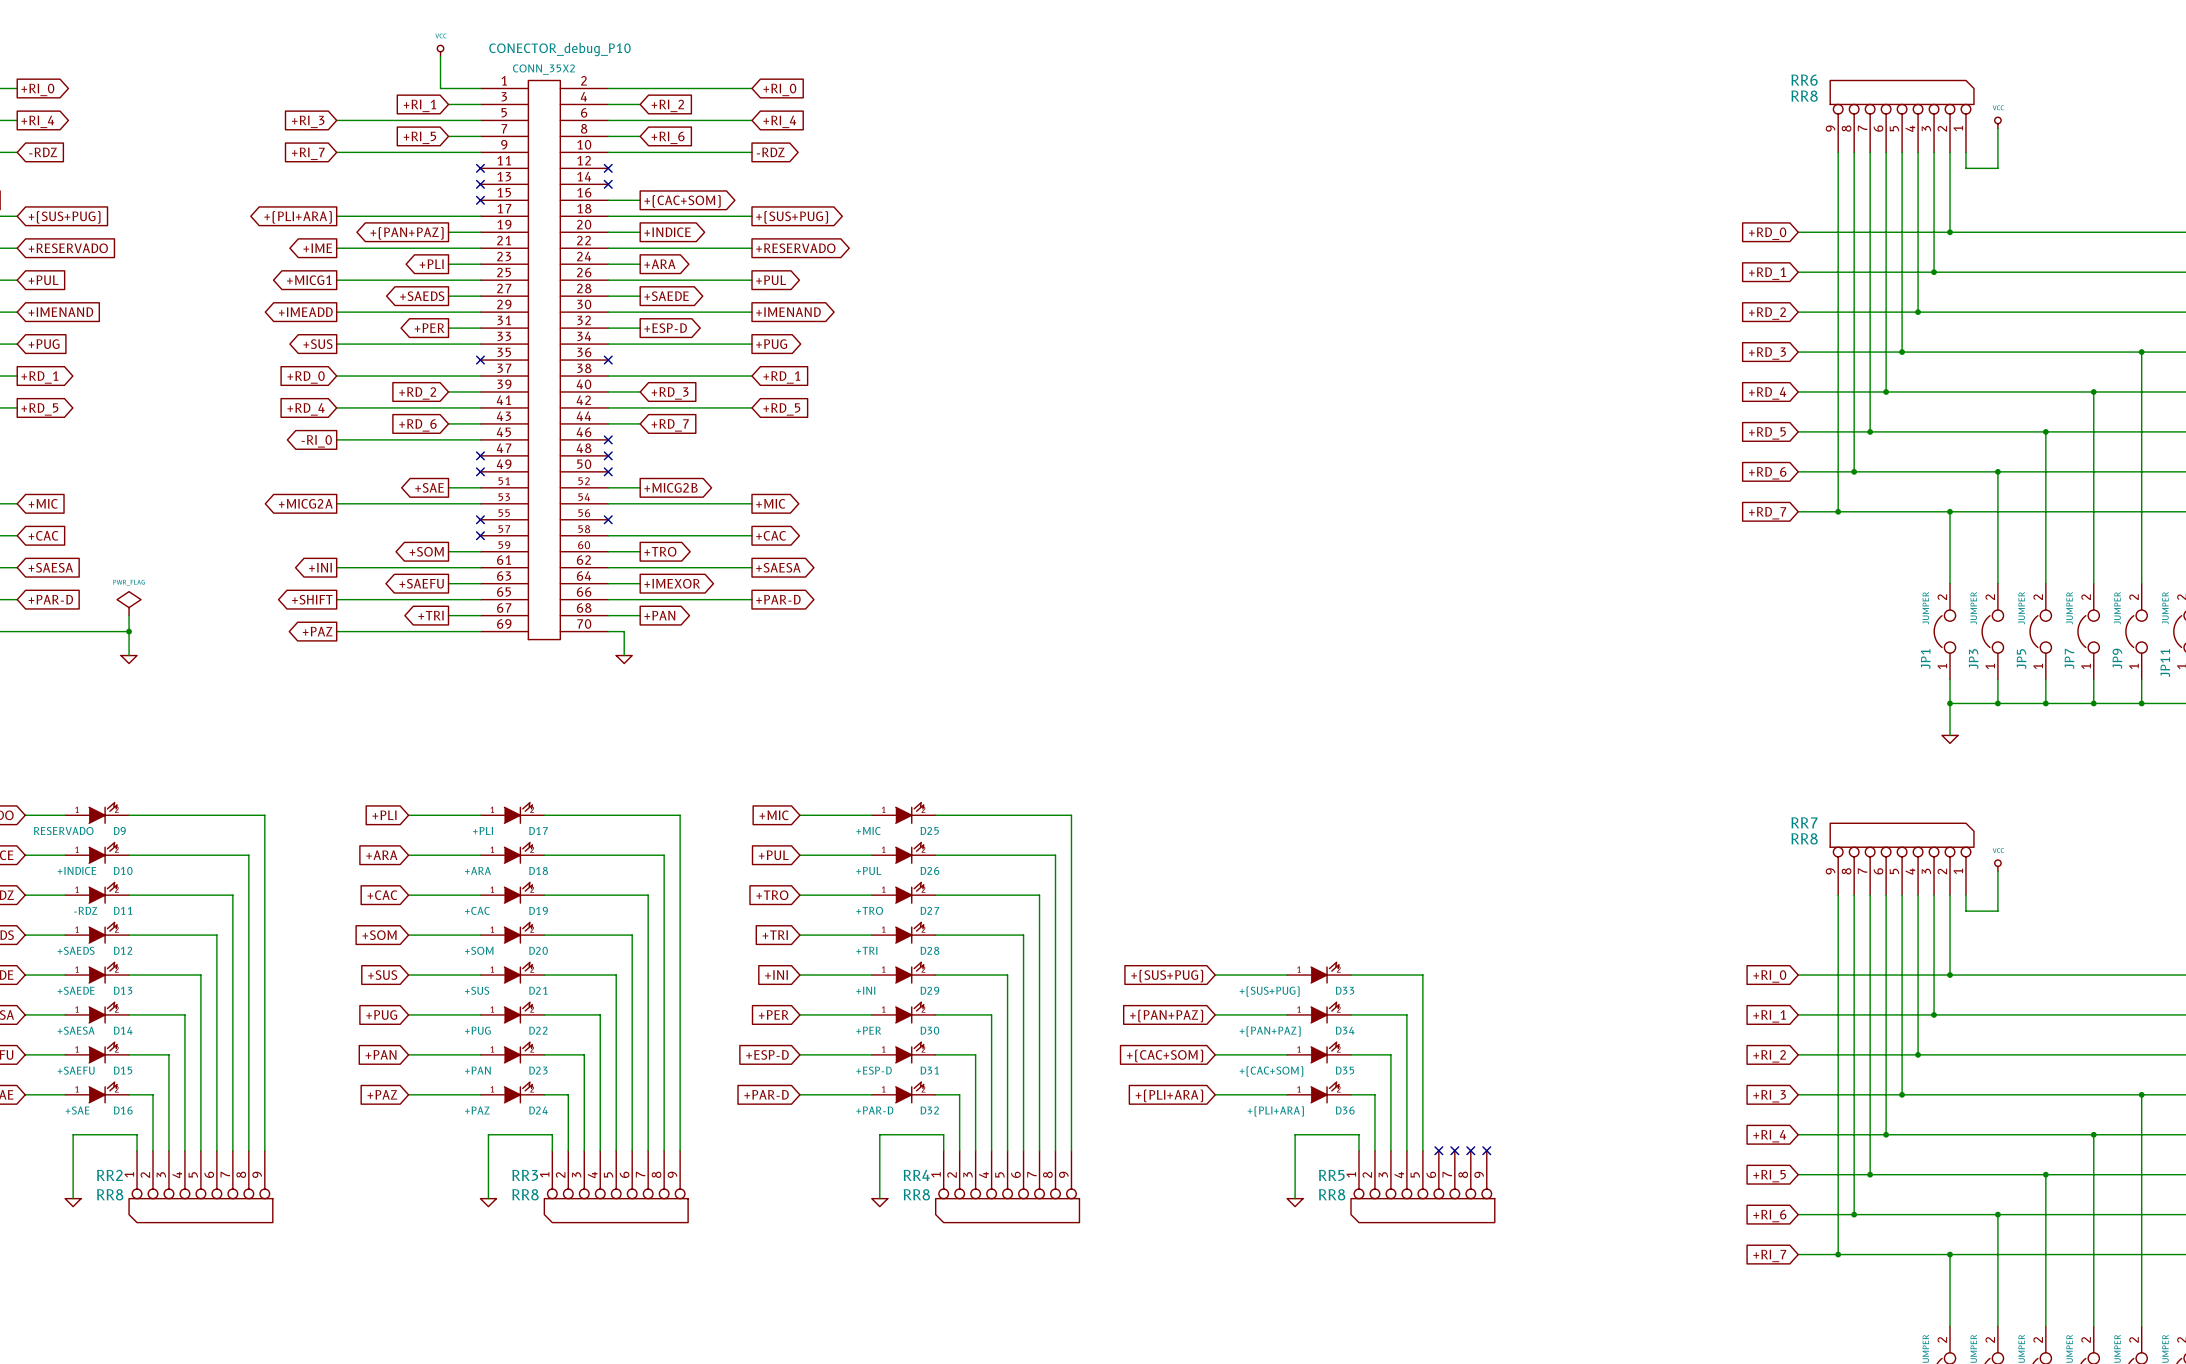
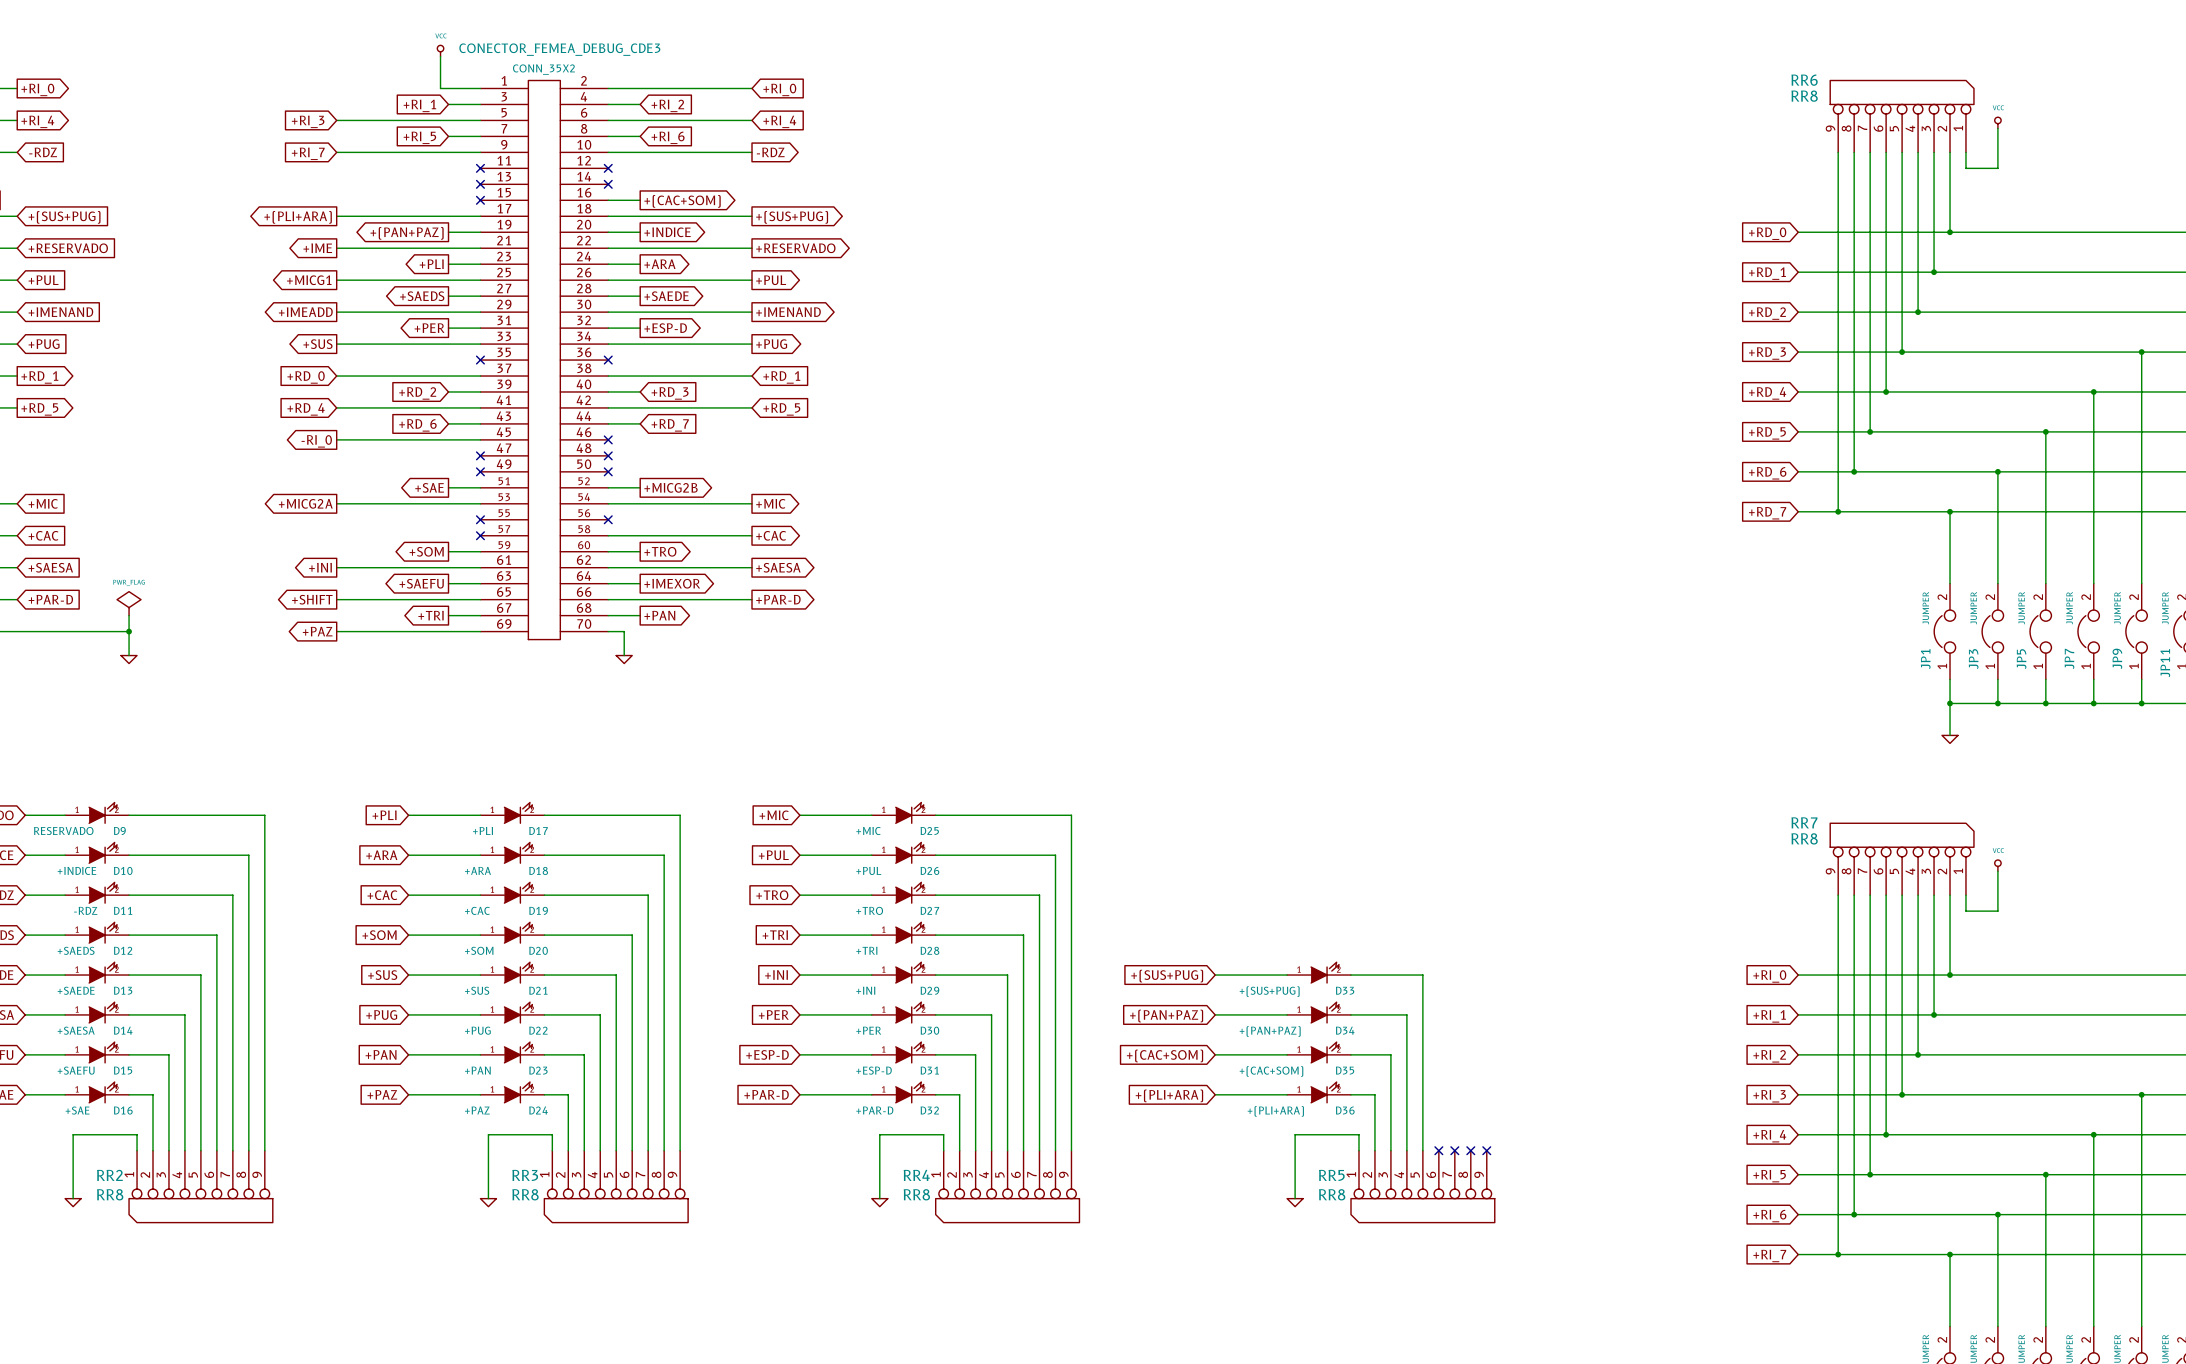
CONECTOR_debug_P10 name: CONECTOR_debug_P10 (560, 49) -> CONECTOR_FEMEA_DEBUG_CDE3 (559, 49)

